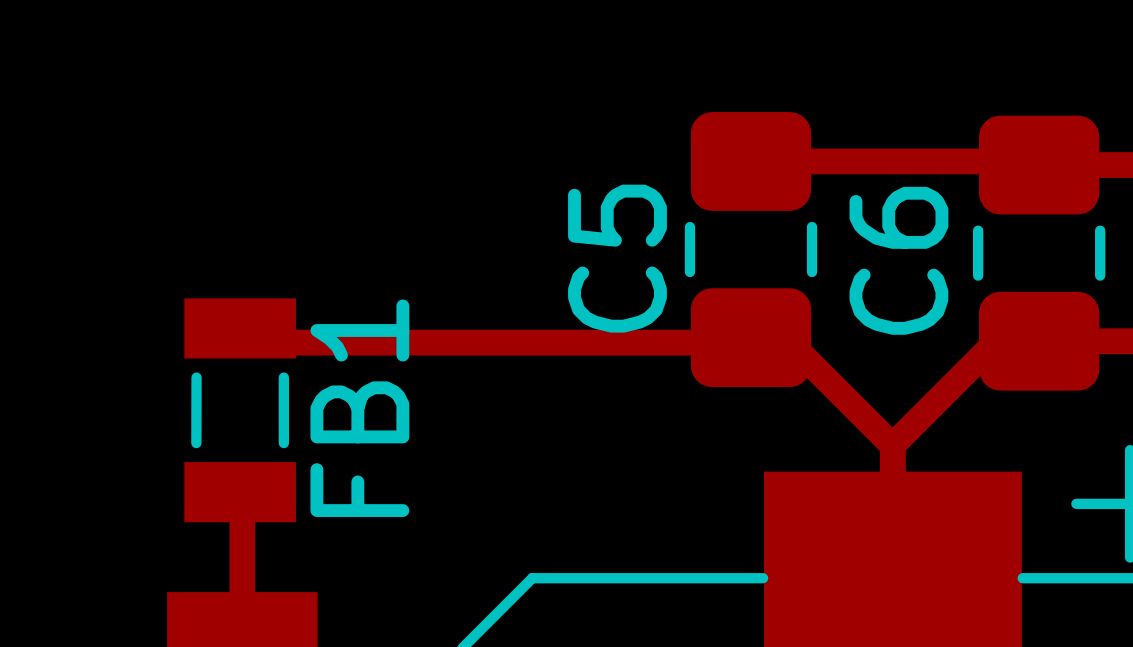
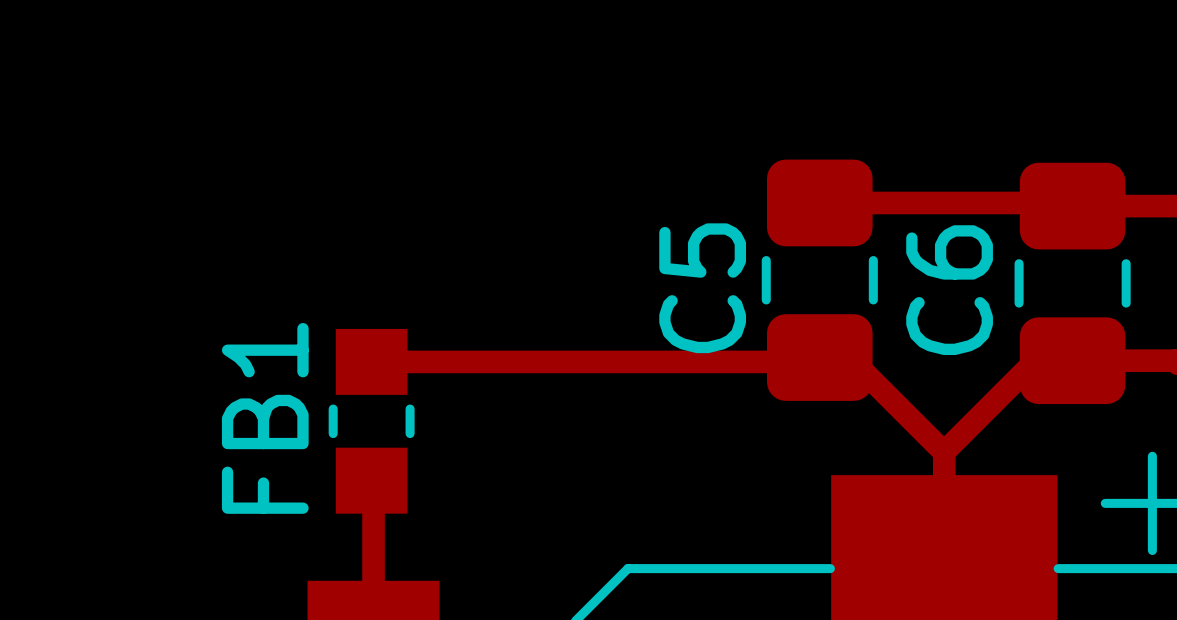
FB1 footprint: [184, 298, 297, 523] -> [328, 328, 415, 514]
FB1 name position: FB1 (359, 408) -> FB1 (265, 418)

